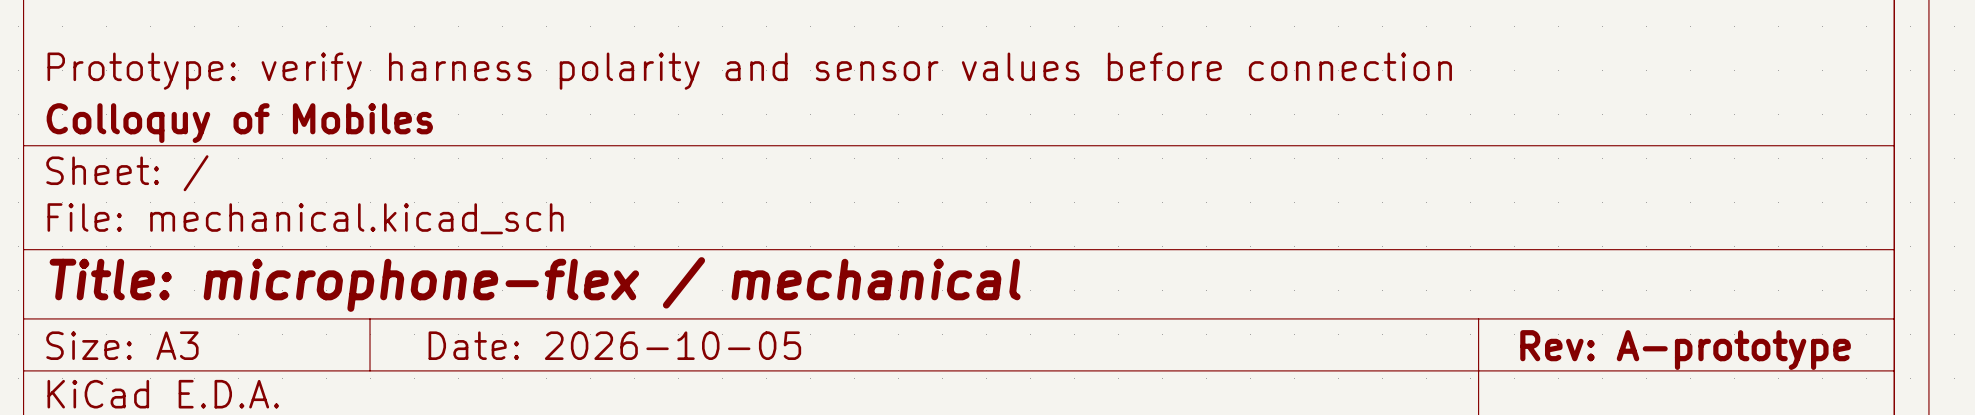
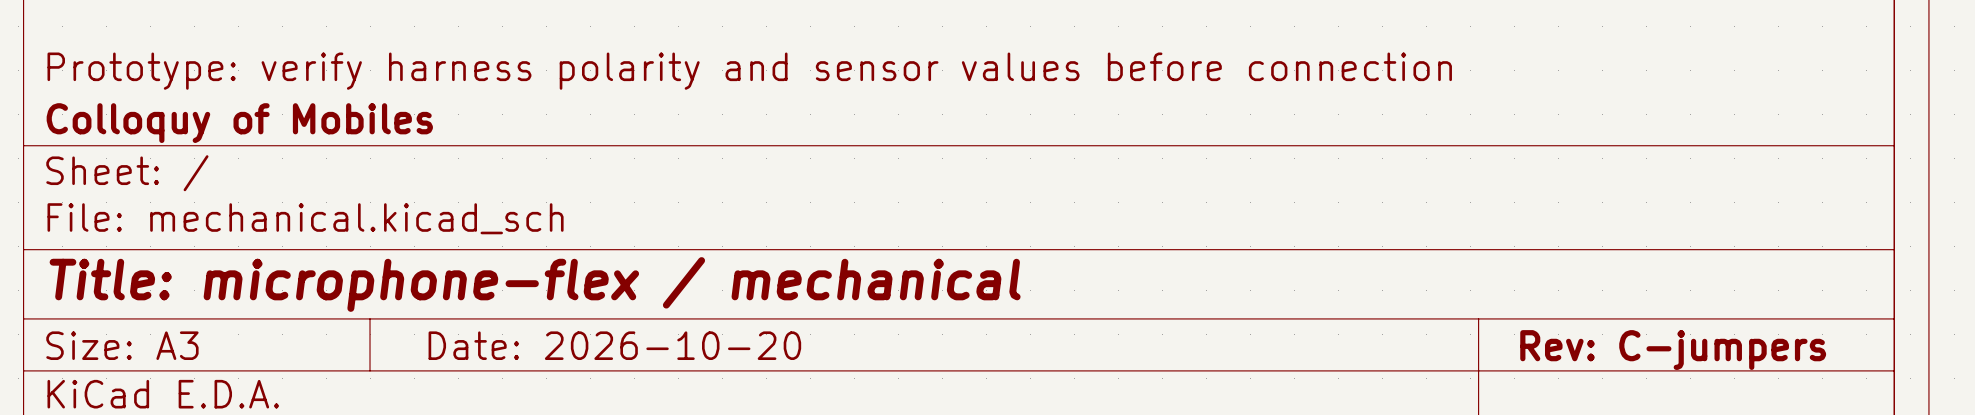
title block: Date: 2026-10-05 (614, 345) -> Date: 2026-10-20 (614, 345)
title block: Rev: A-prototype (1685, 350) -> Rev: C-jumpers (1673, 350)

